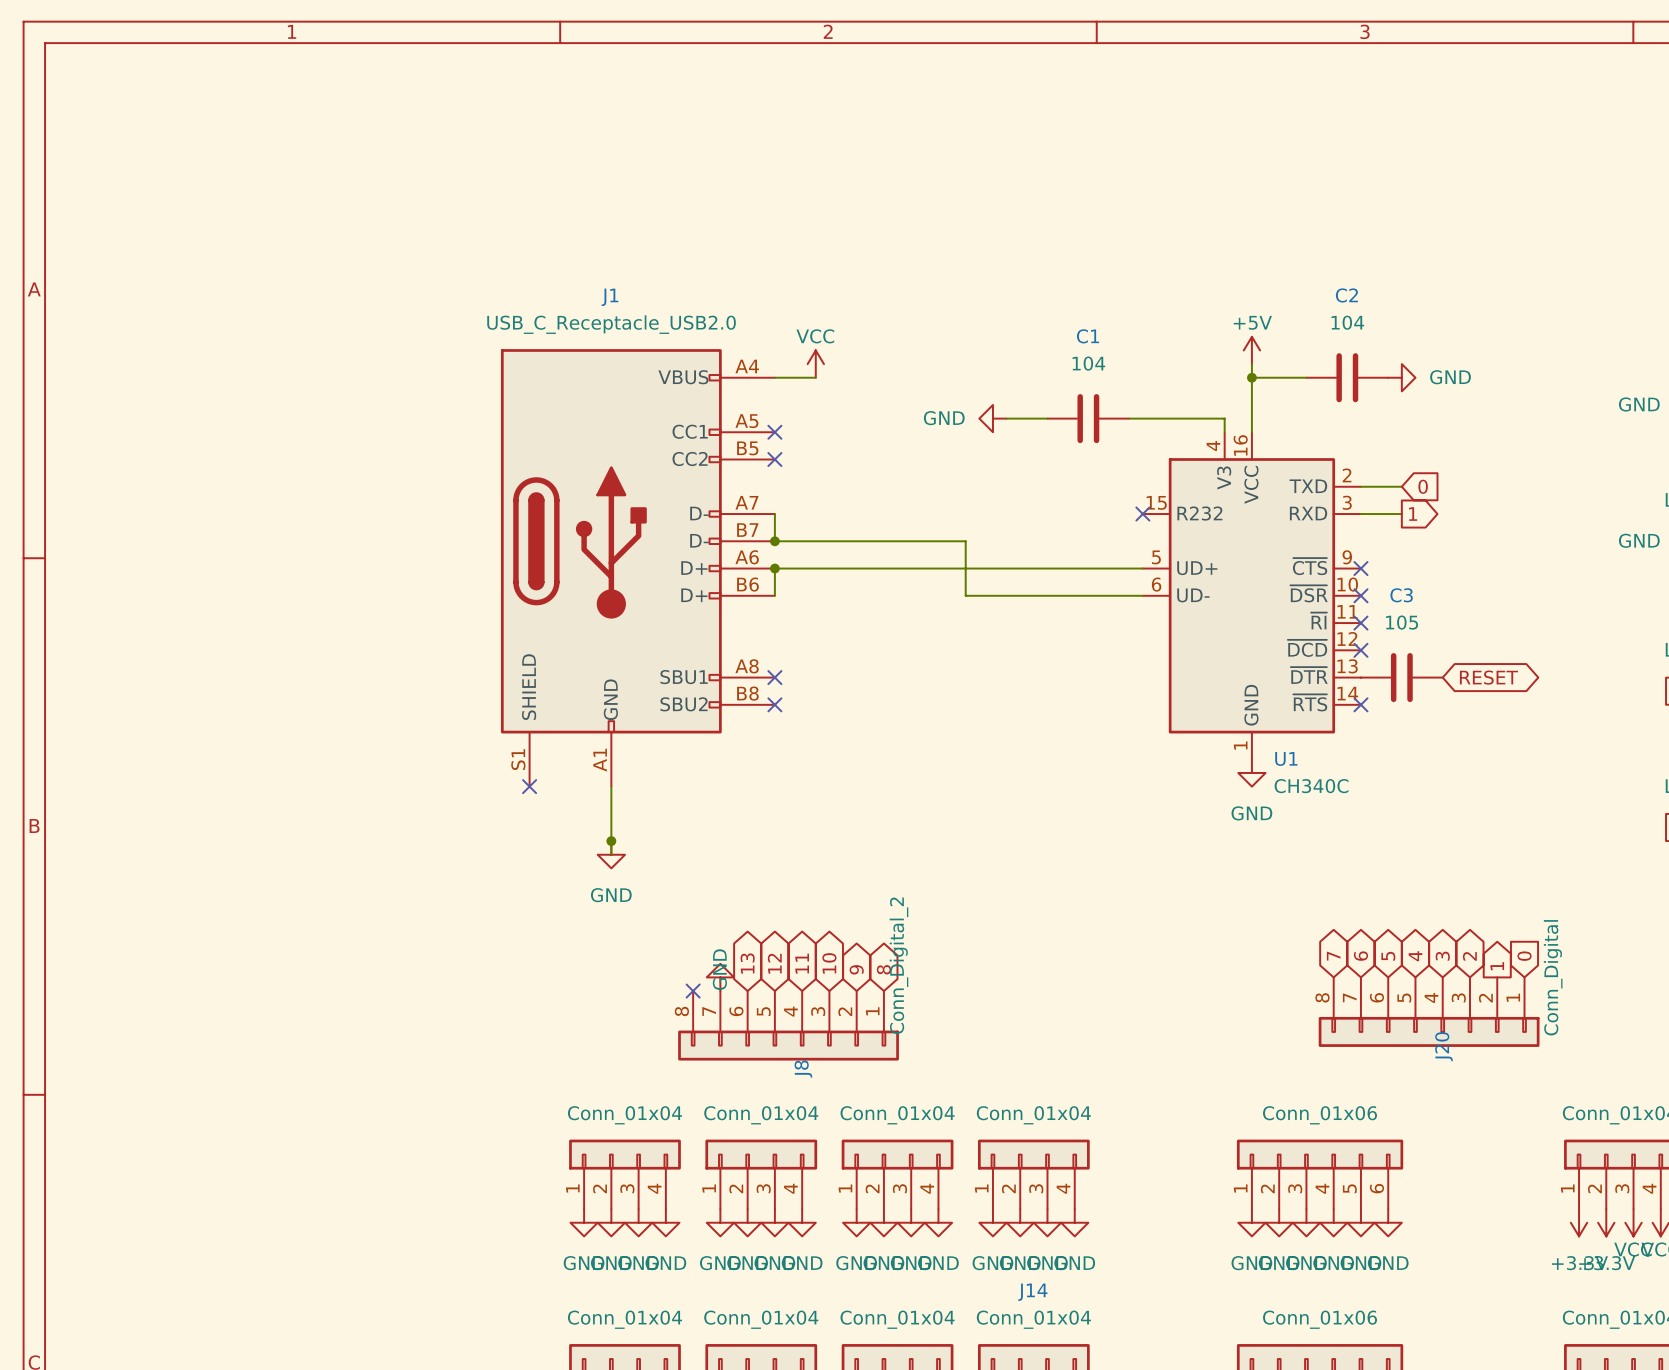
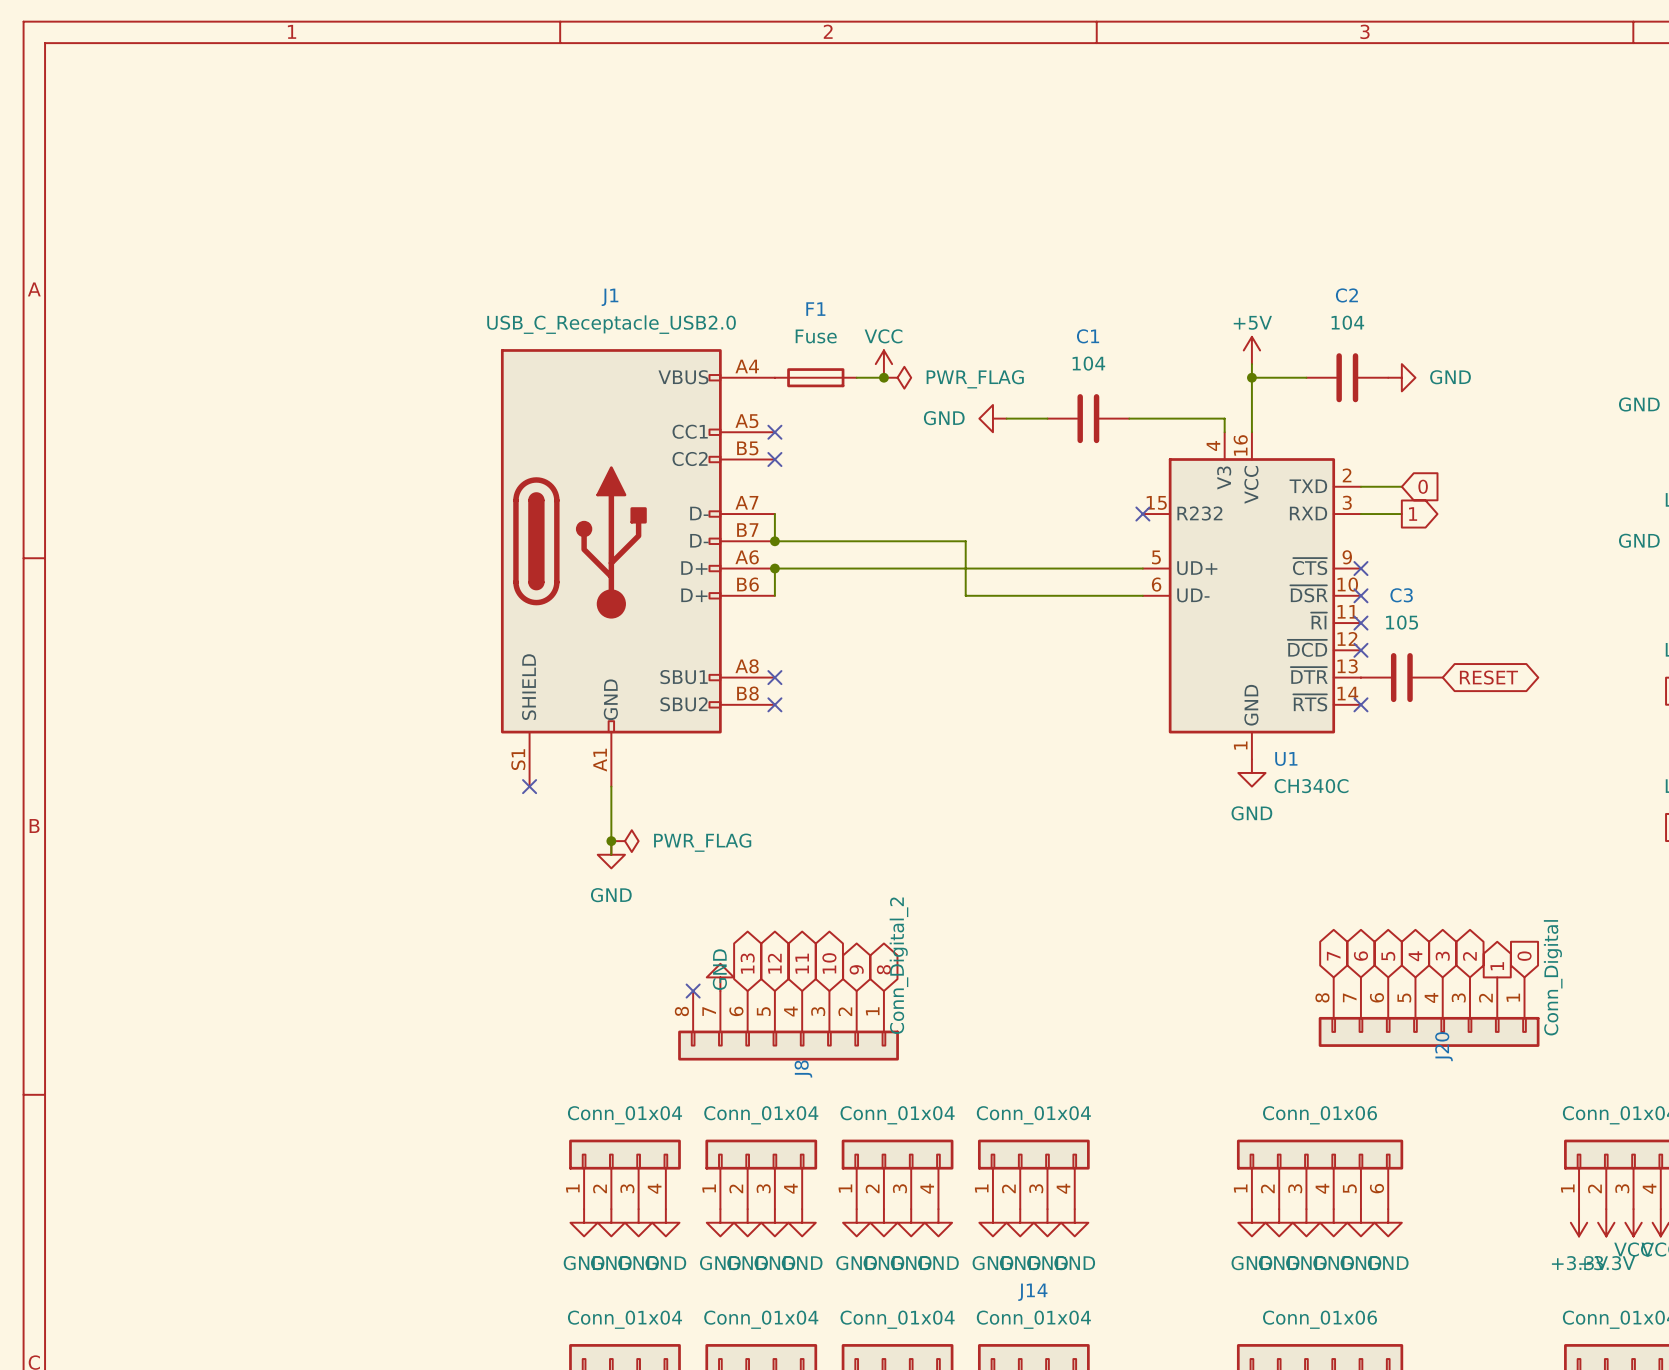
power symbol position: VCC (815, 364) -> VCC (883, 364)
F1: none -> Fuse (815, 377)
wire: none -> (856, 377) (883, 377)
junction: none -> (883, 377)
power symbol: none -> PWR_FLAG (897, 377)
power symbol: none -> PWR_FLAG (624, 841)

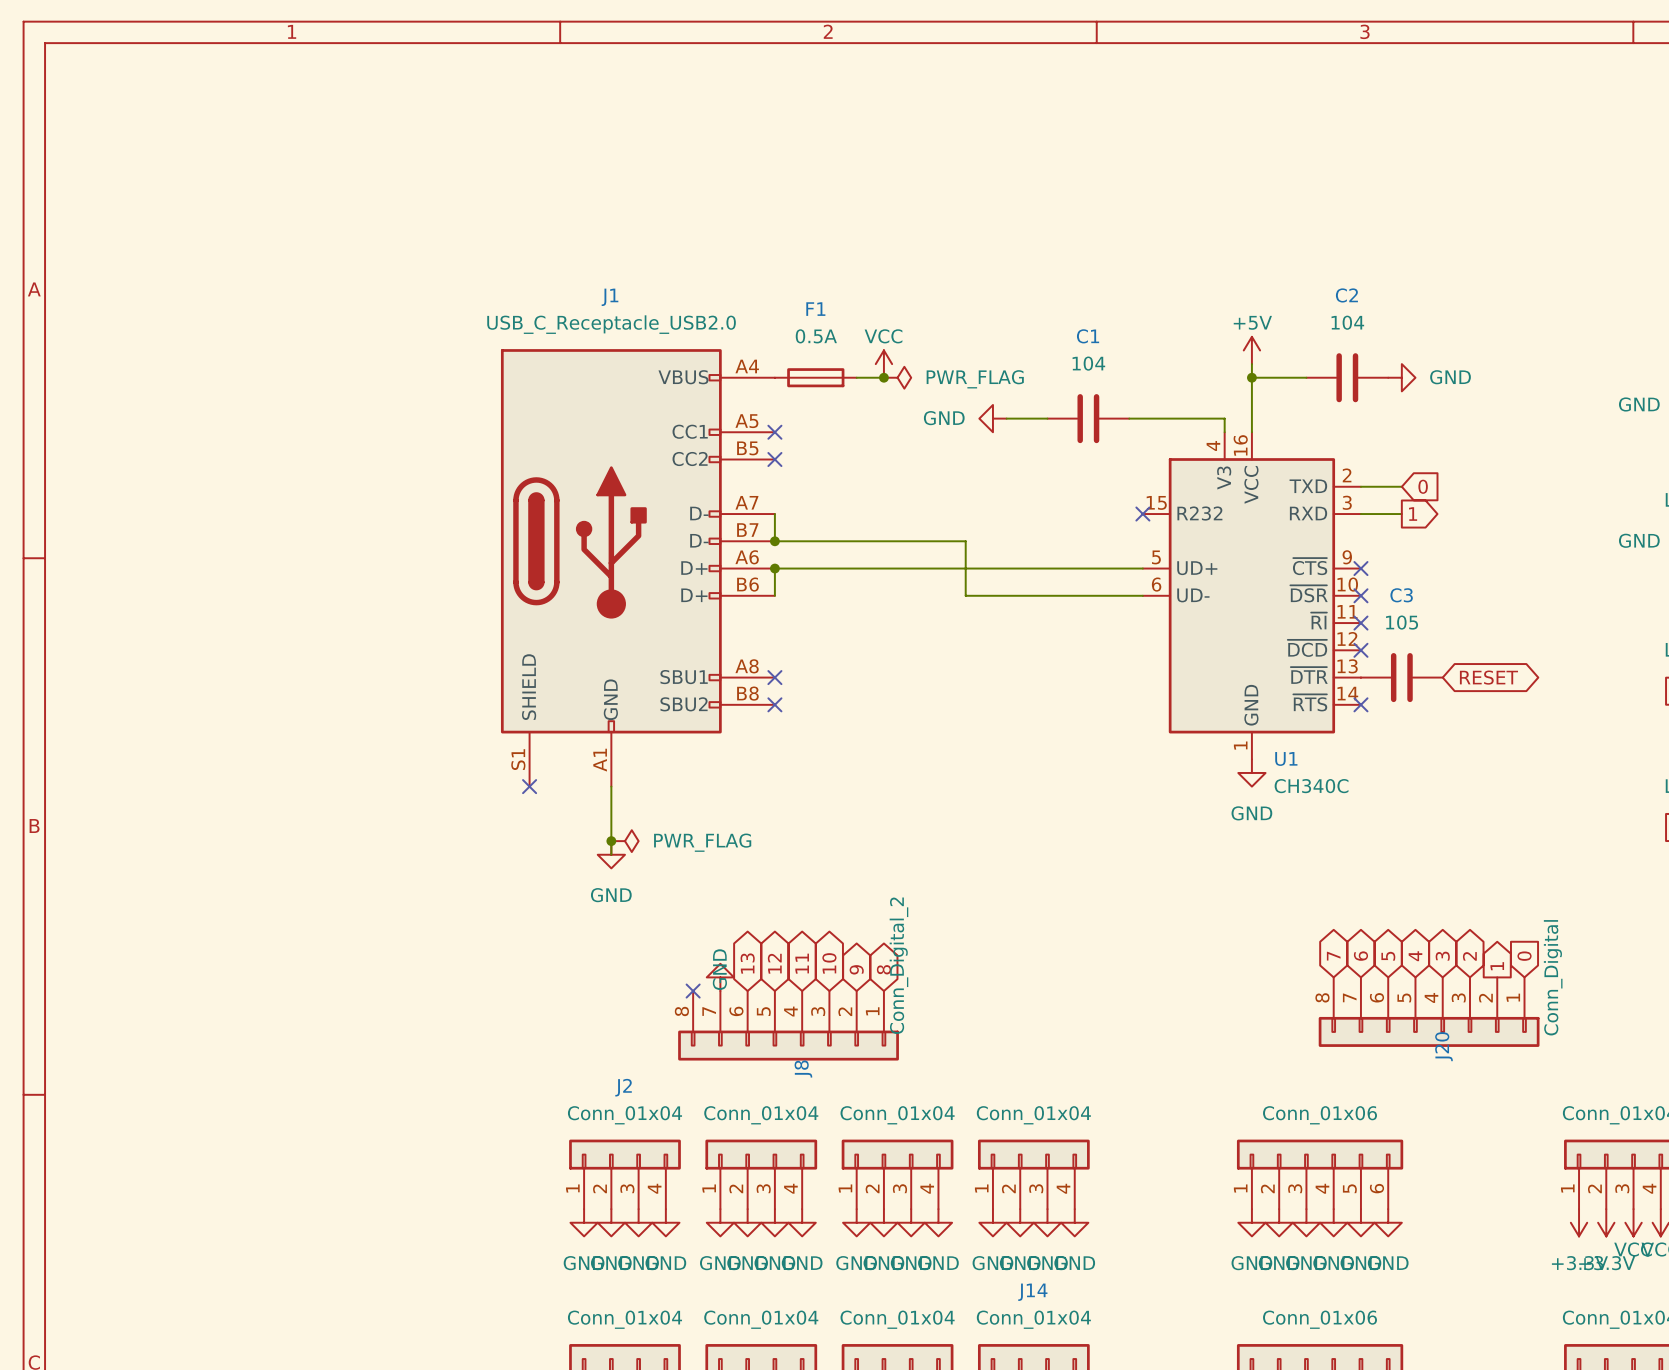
F1 value: Fuse (816, 336) -> 0.5A (816, 336)
J2 name: none -> J2 (623, 1087)

